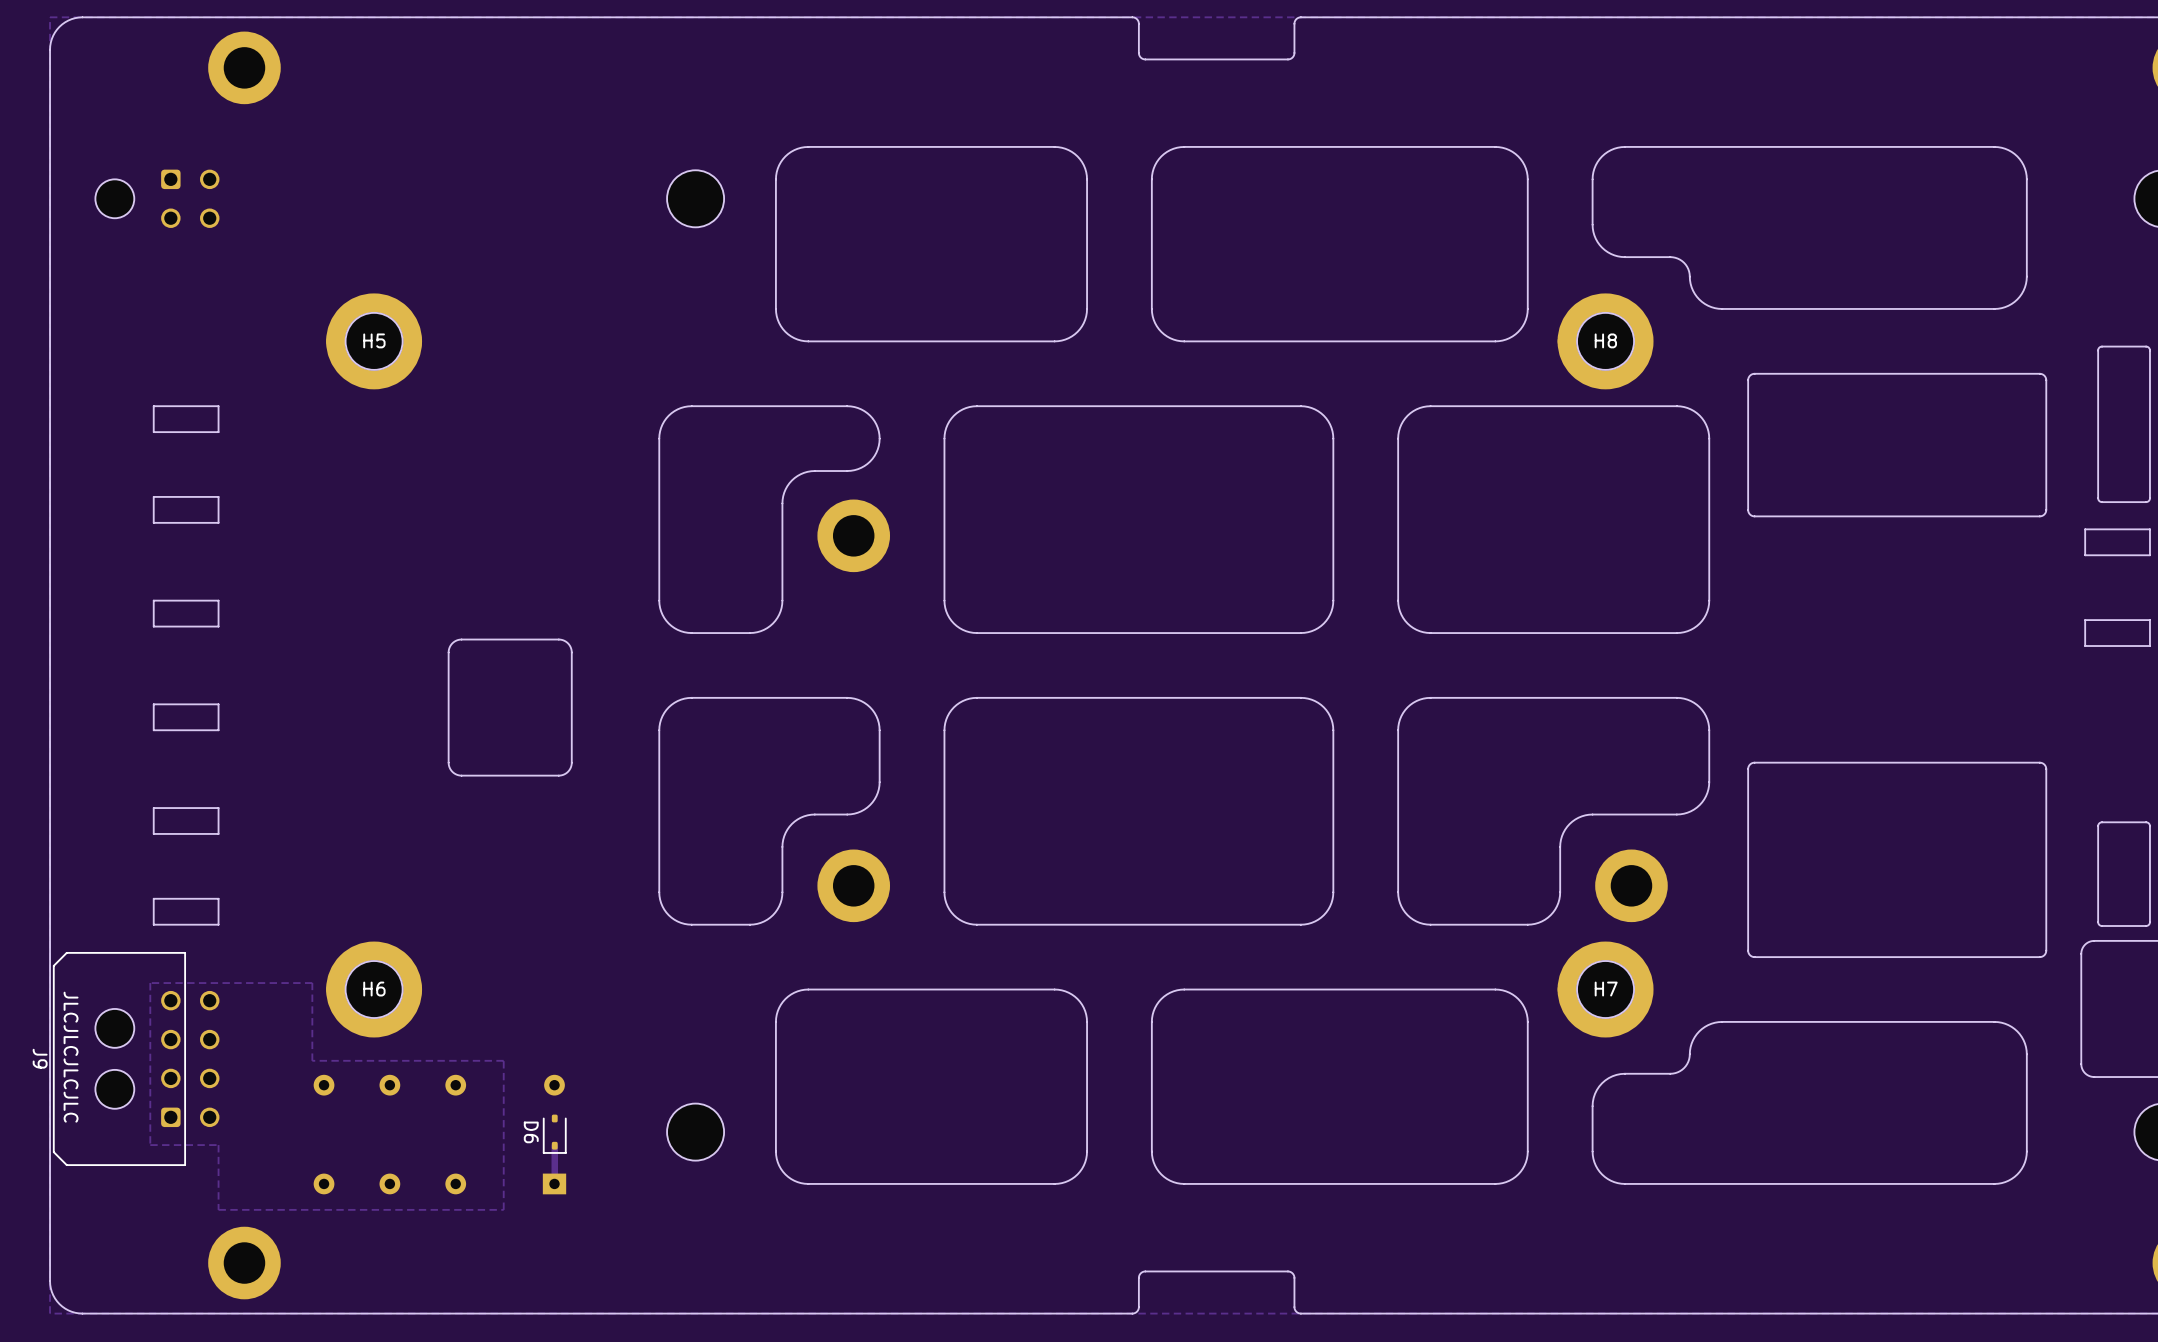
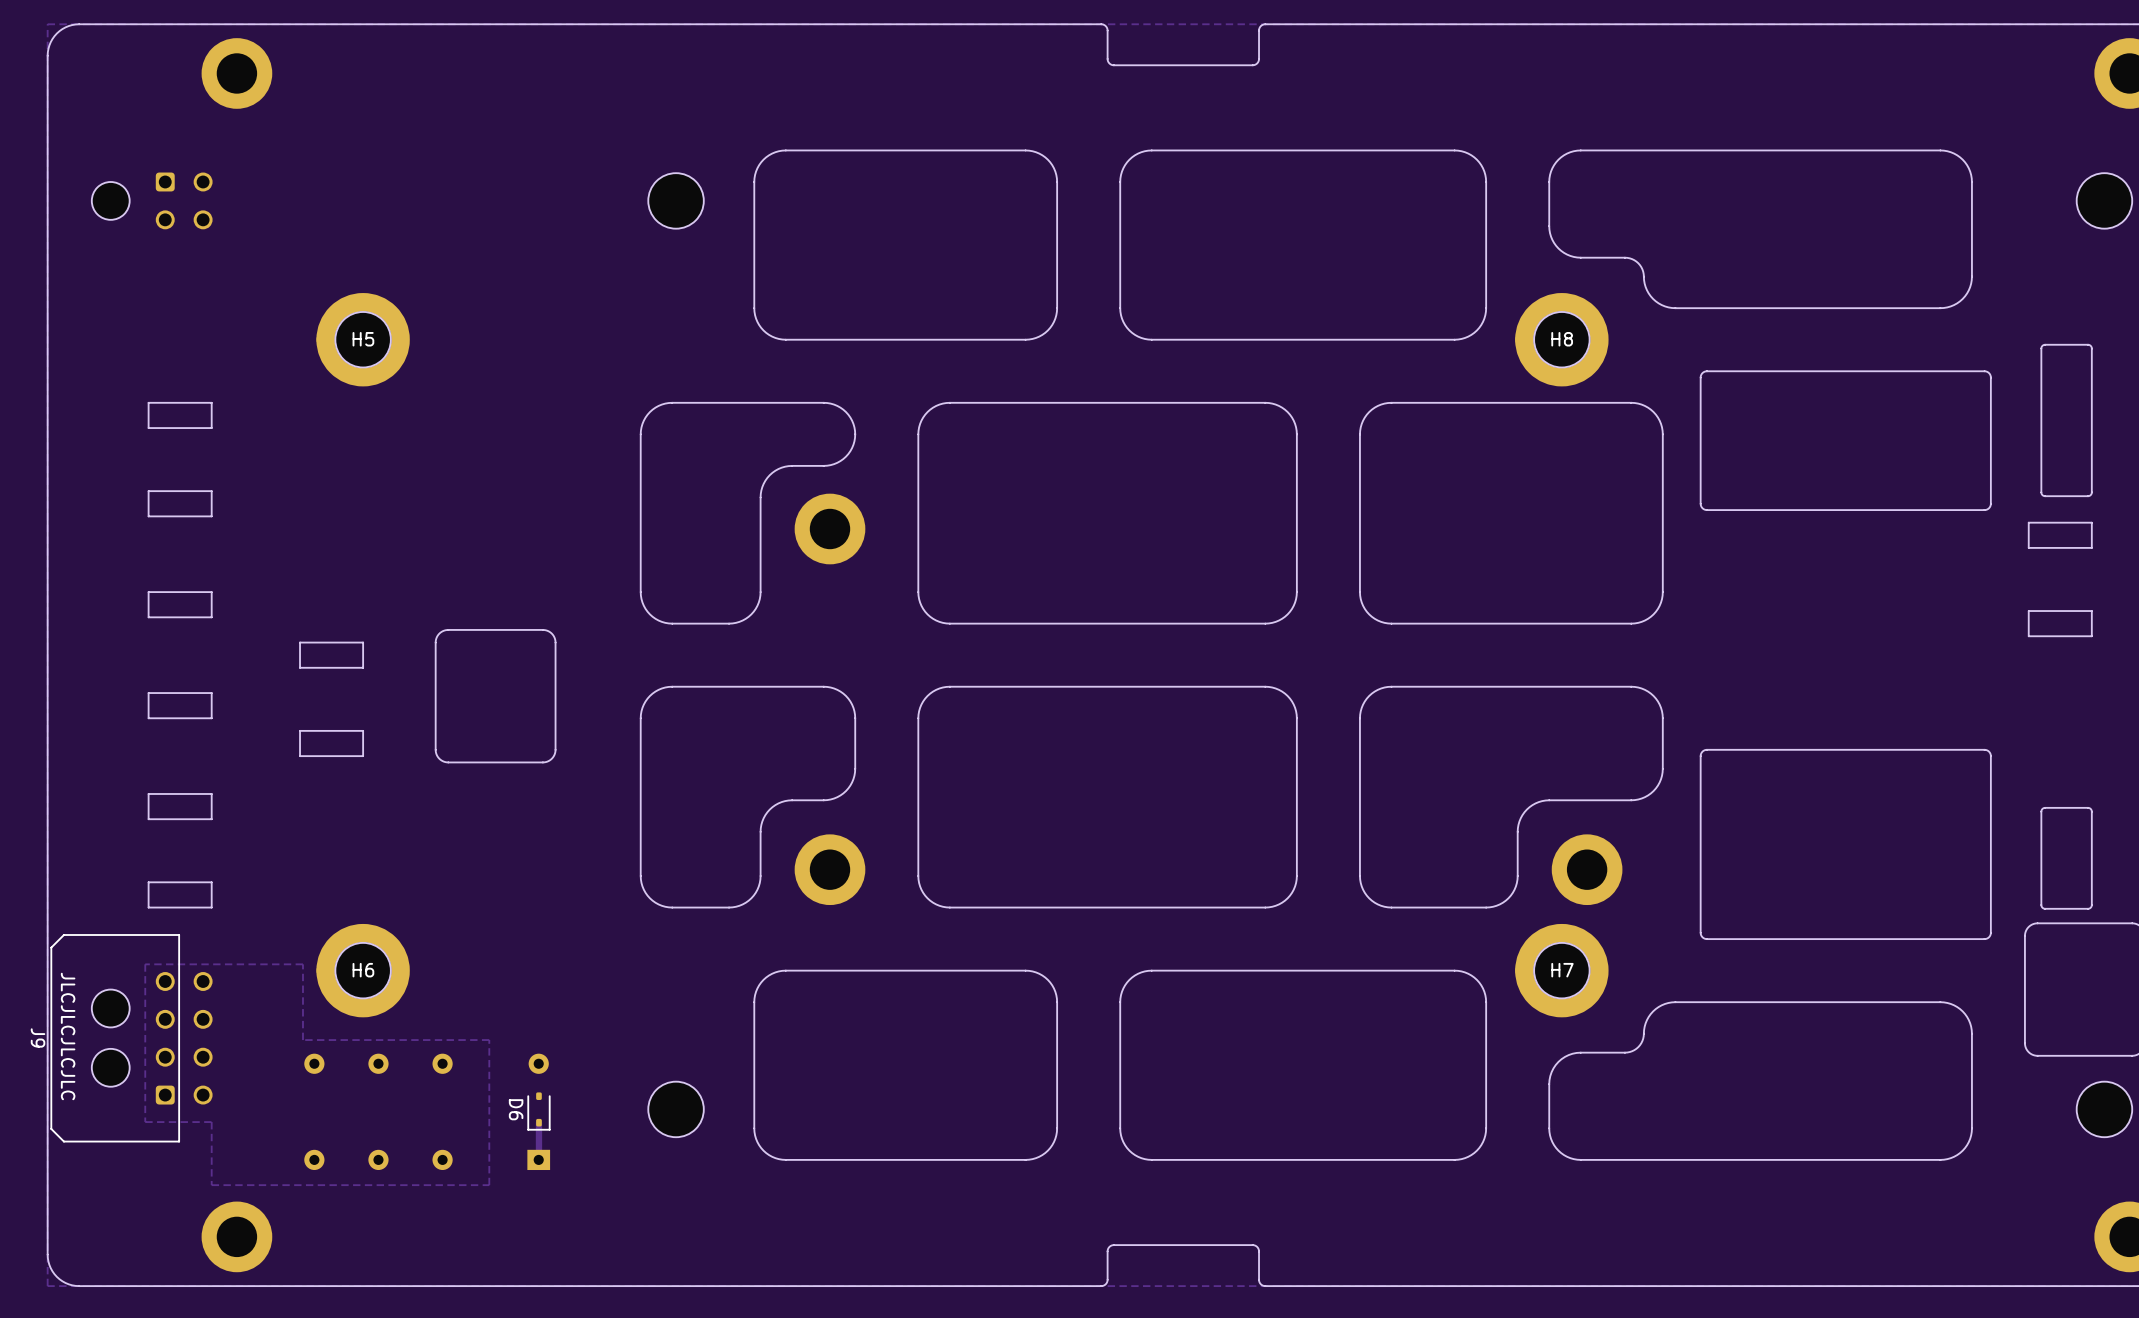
board edge: none -> (363, 642) (300, 642) (300, 667) (363, 667) (363, 642)
board edge: none -> (363, 730) (363, 756) (300, 756) (300, 730) (363, 730)

